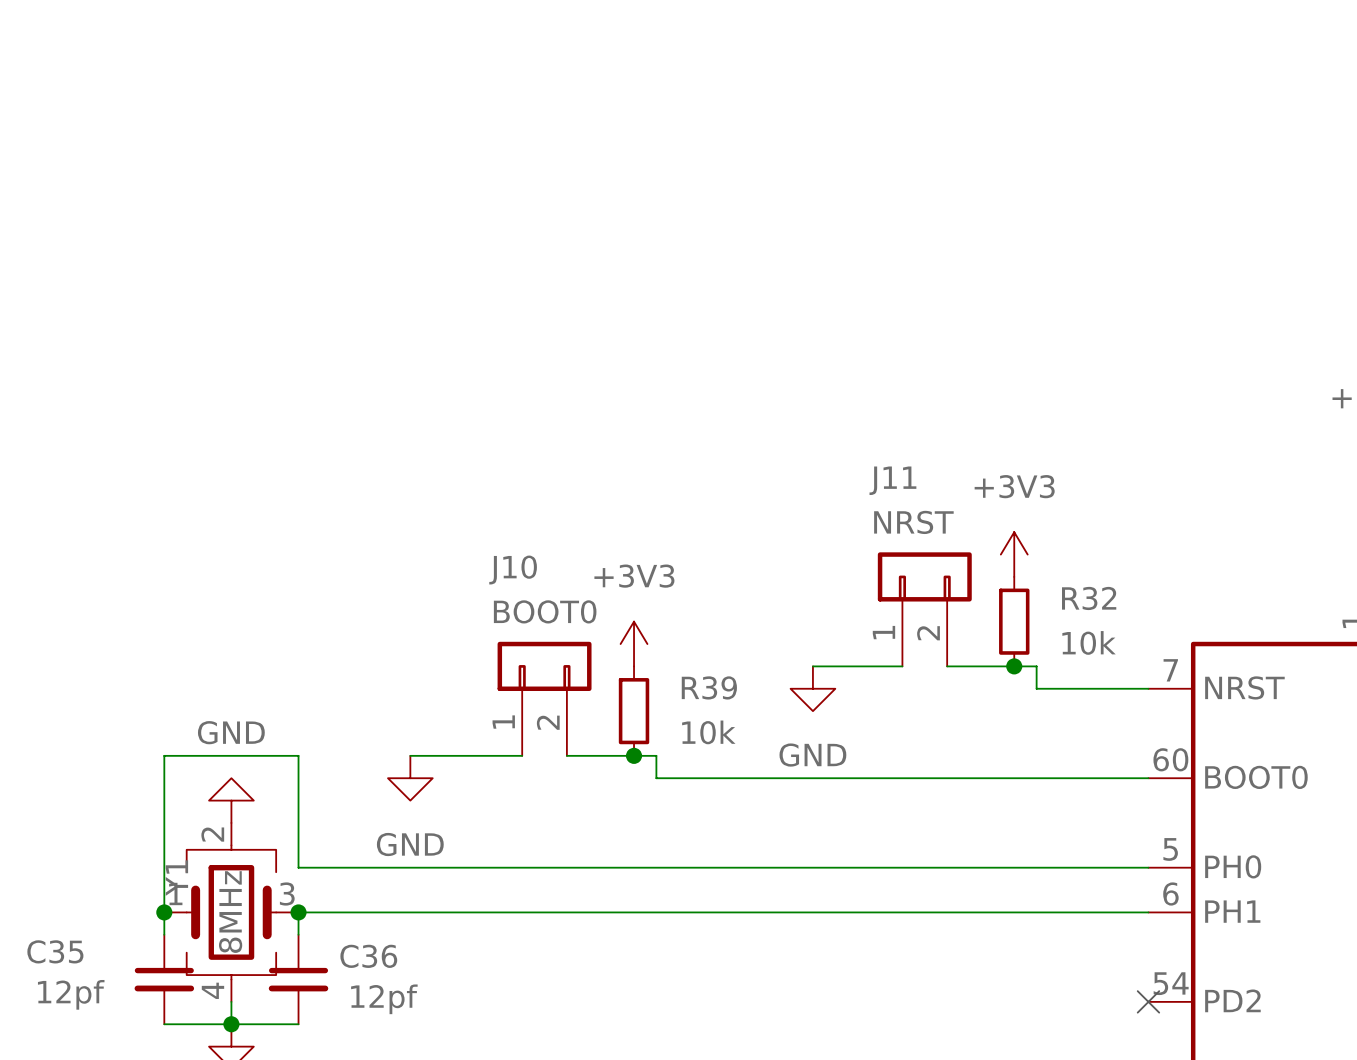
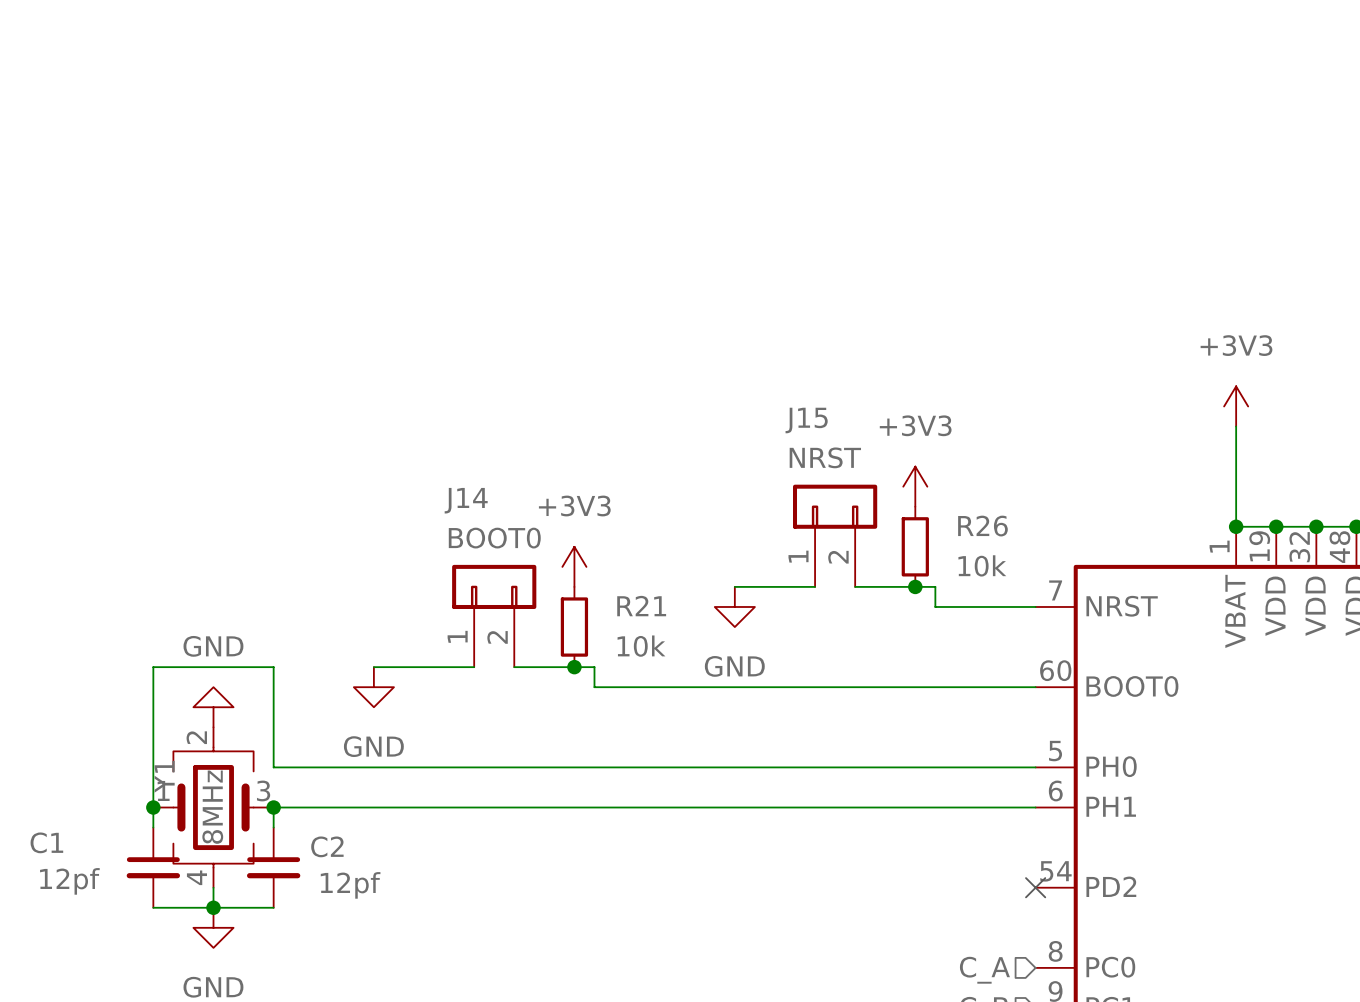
J11 name: J11 (892, 480) -> J15 (806, 420)
J10 name: J10 (513, 570) -> J14 (466, 500)
R32 name: R32 (1089, 598) -> R26 (982, 526)
R39 name: R39 (709, 687) -> R21 (641, 606)
C35 name: C35 (55, 951) -> C1 (46, 842)
C36 name: C36 (368, 956) -> C2 (327, 846)

